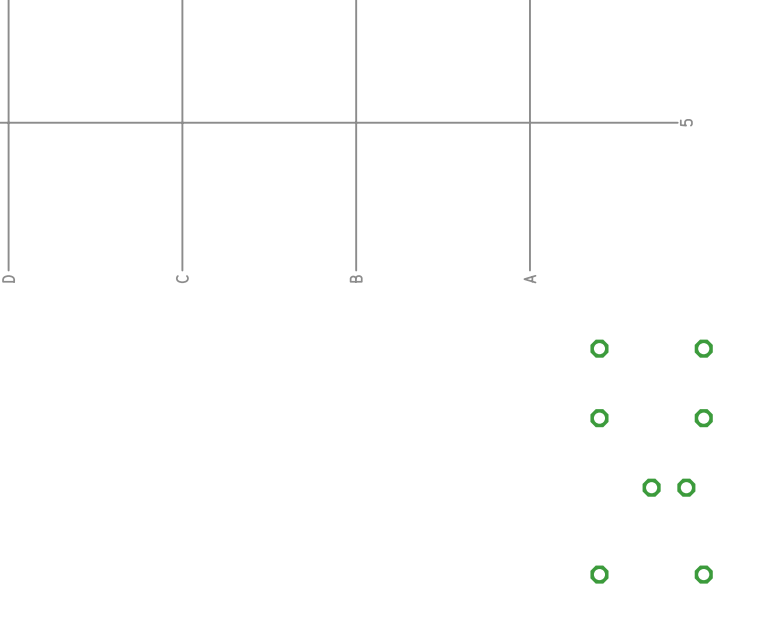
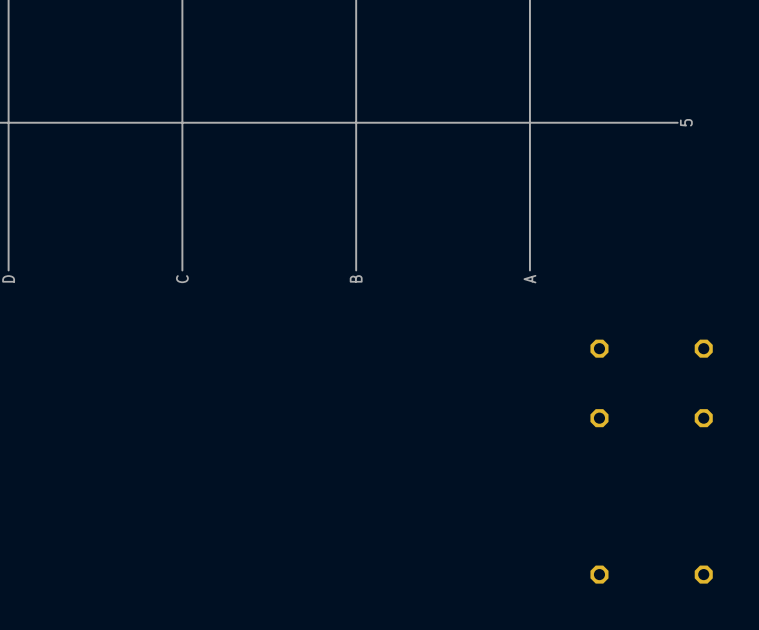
part: (668, 487) -> none

